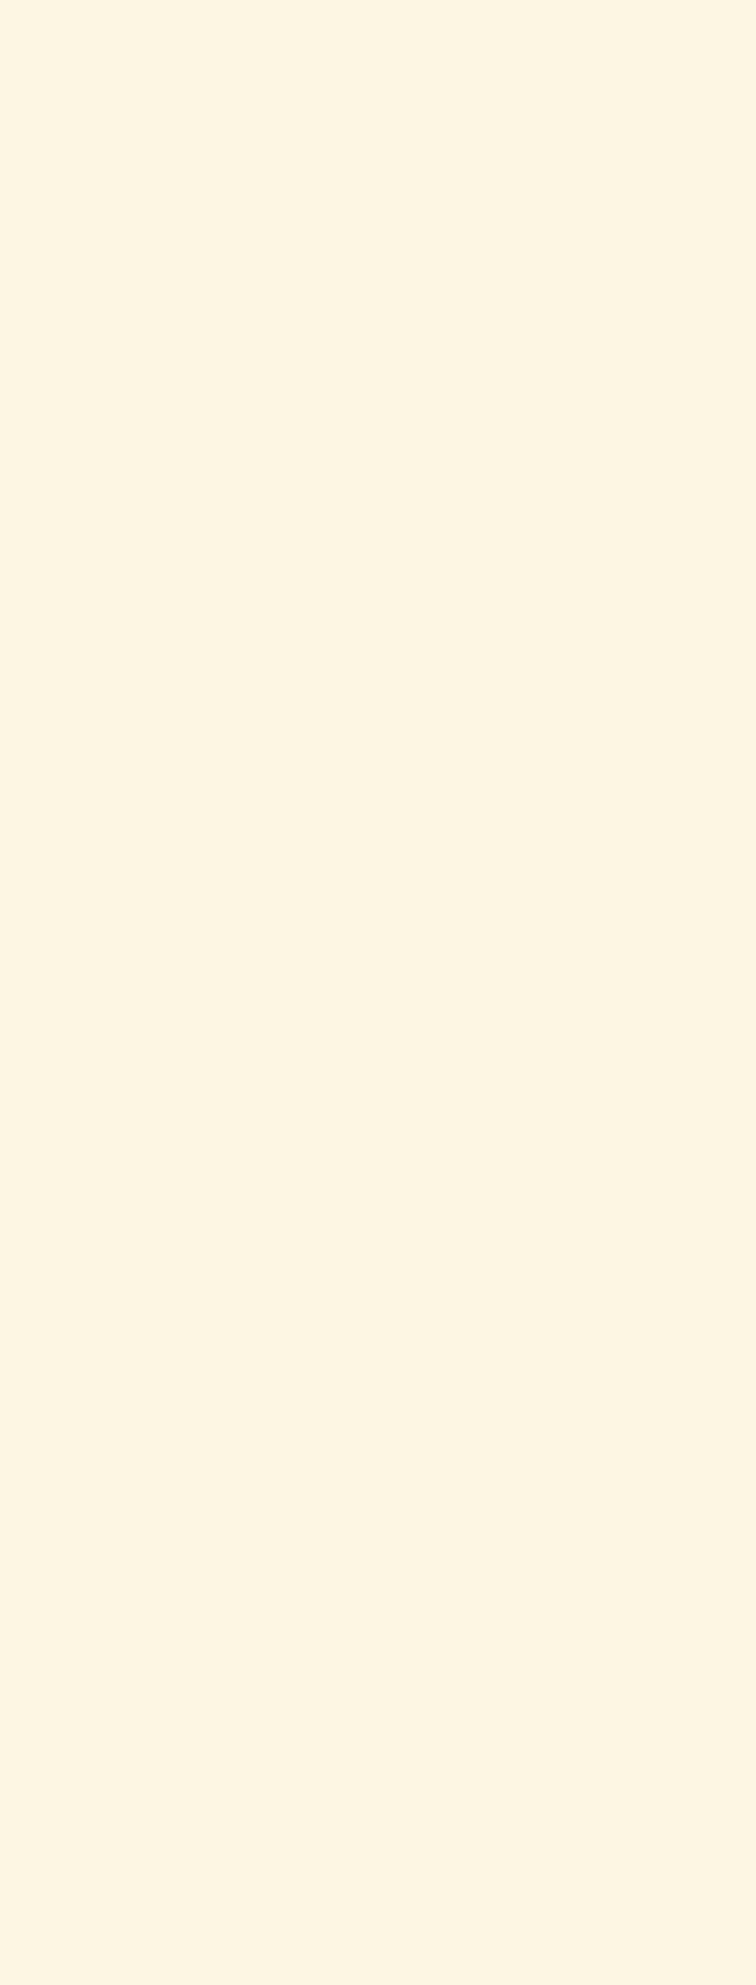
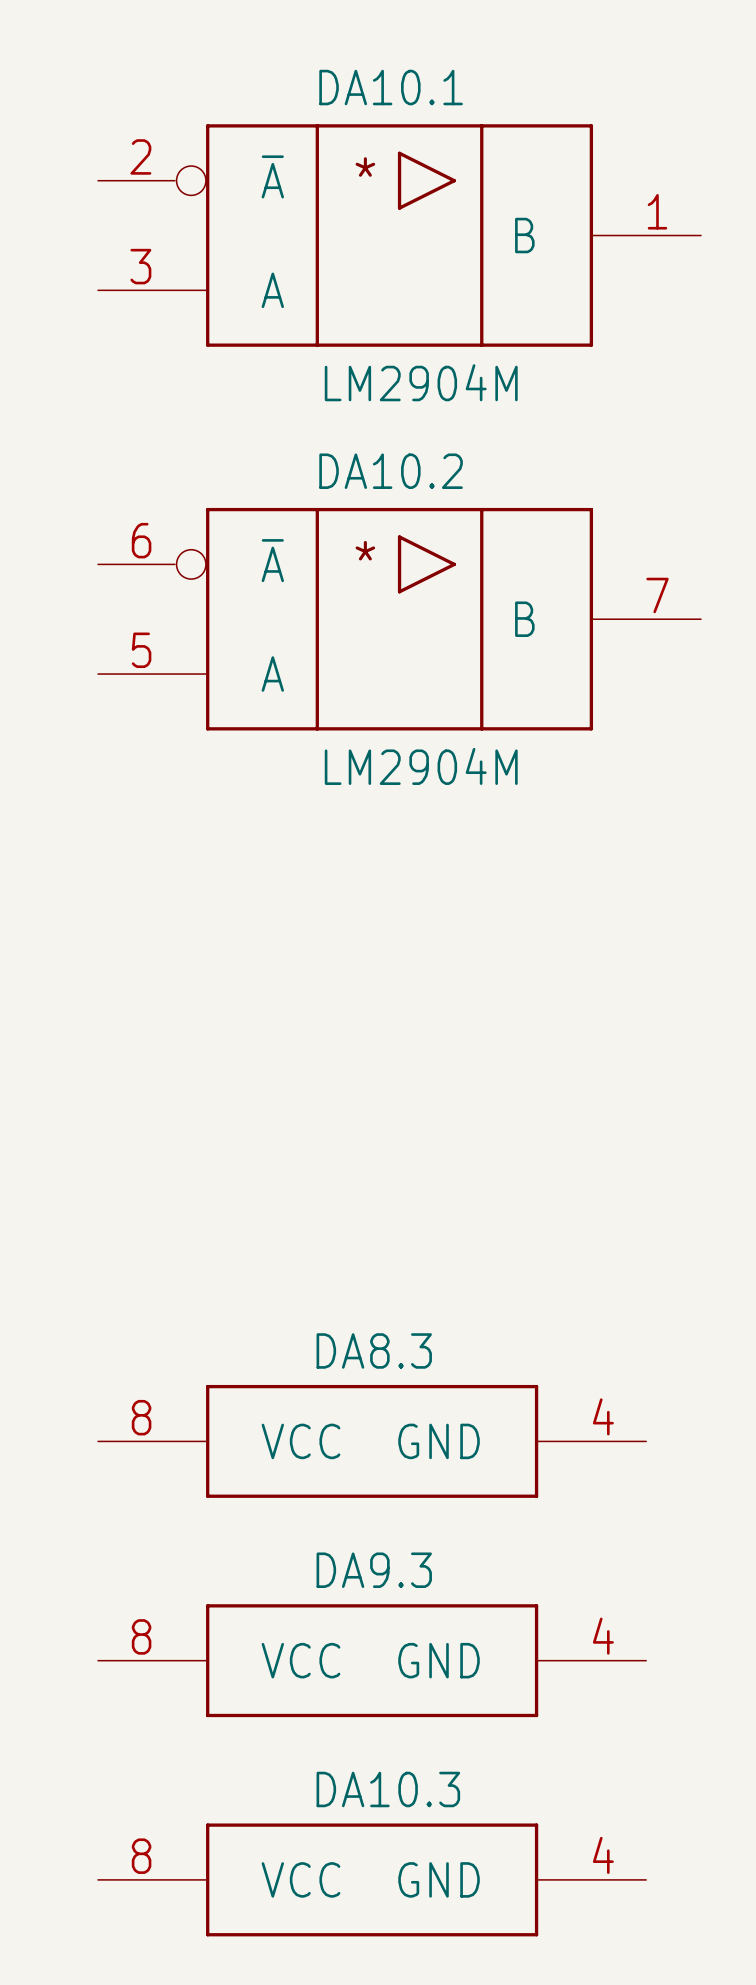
DA10.1: none -> LM2904M (399, 235)
DA10.2: none -> LM2904M (399, 619)
DA8.3: none -> (372, 1441)
DA9.3: none -> (372, 1660)
DA10.3: none -> (372, 1879)

